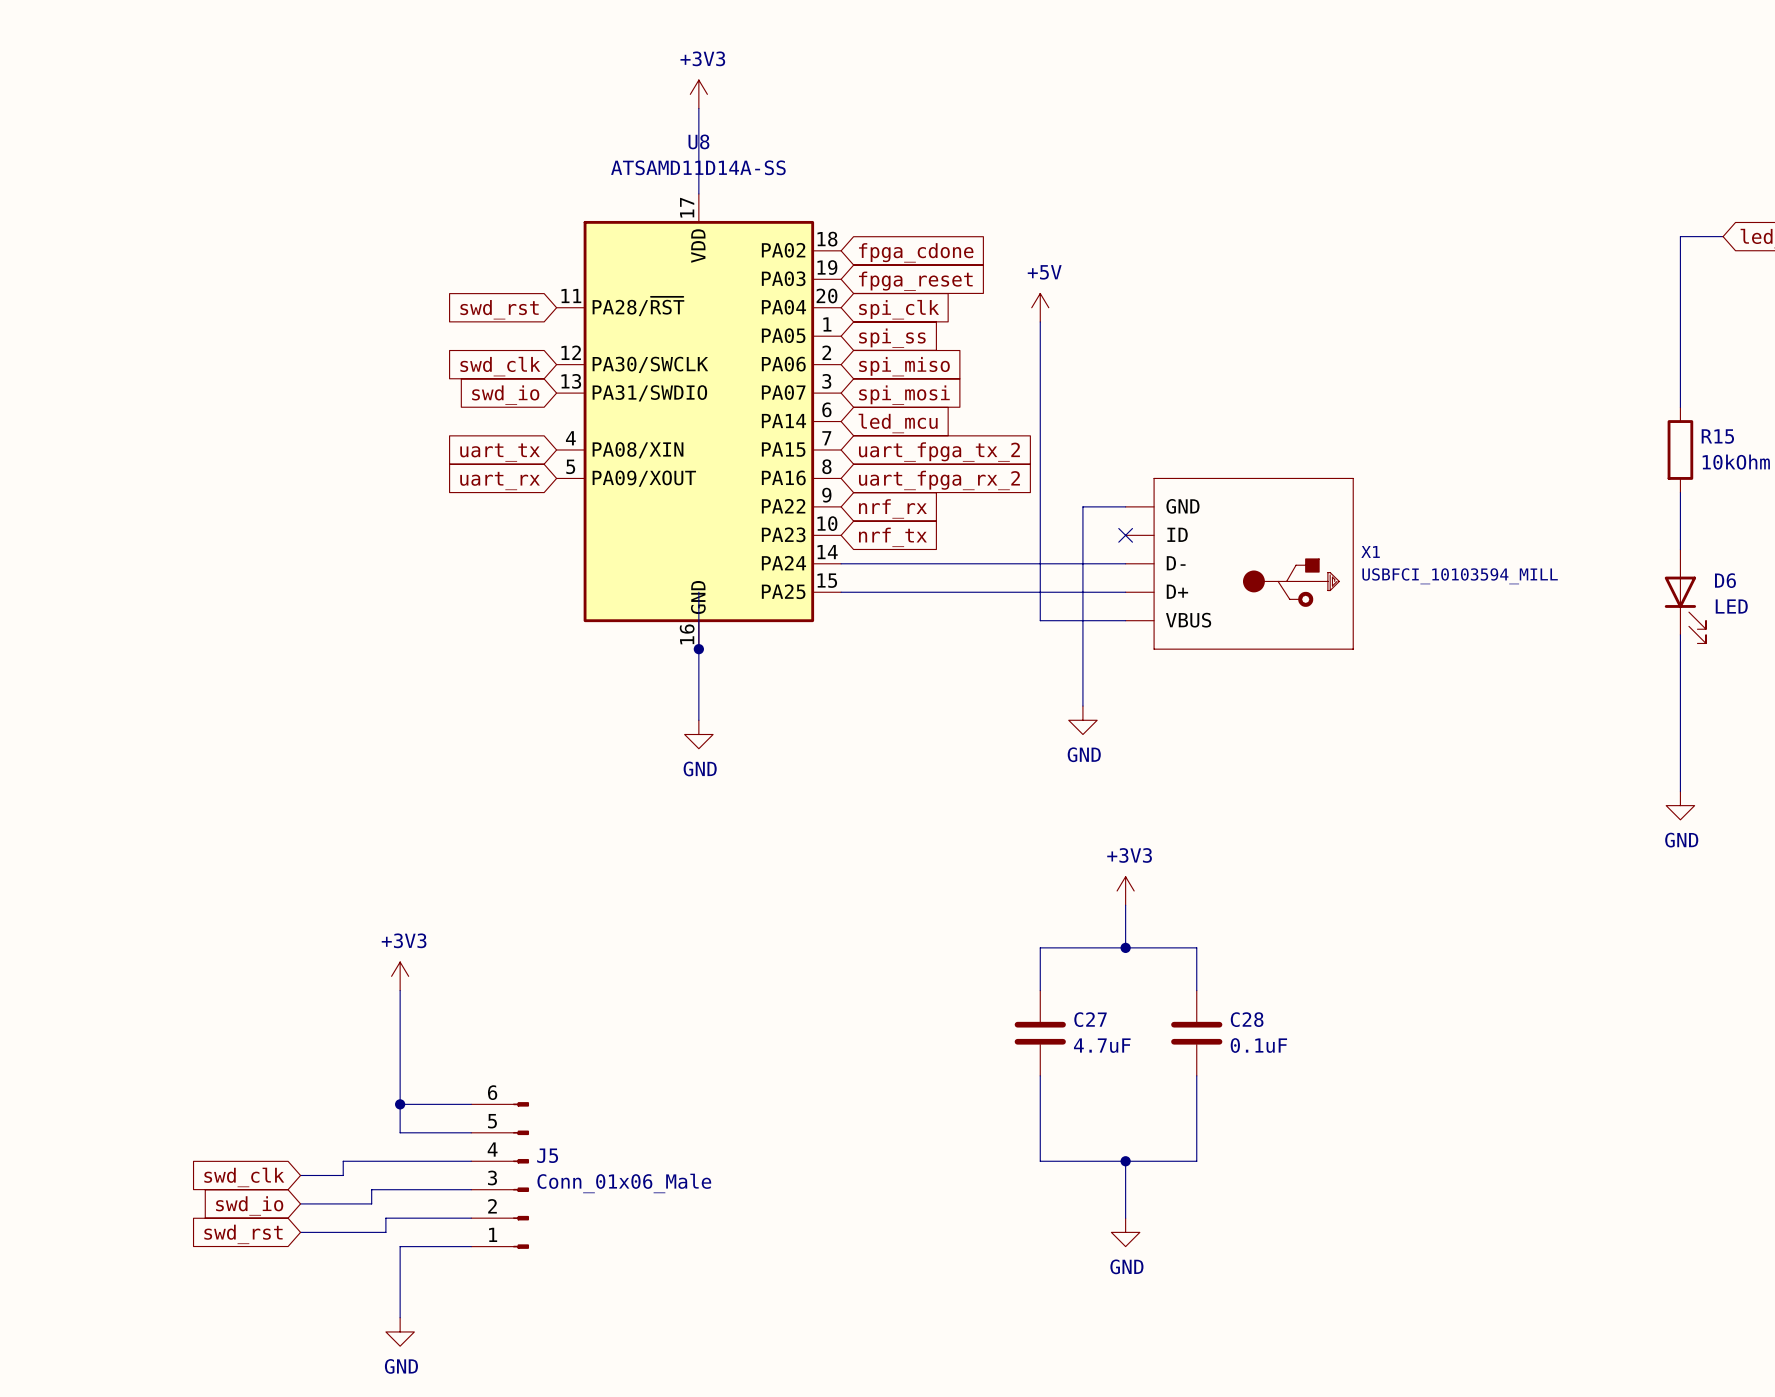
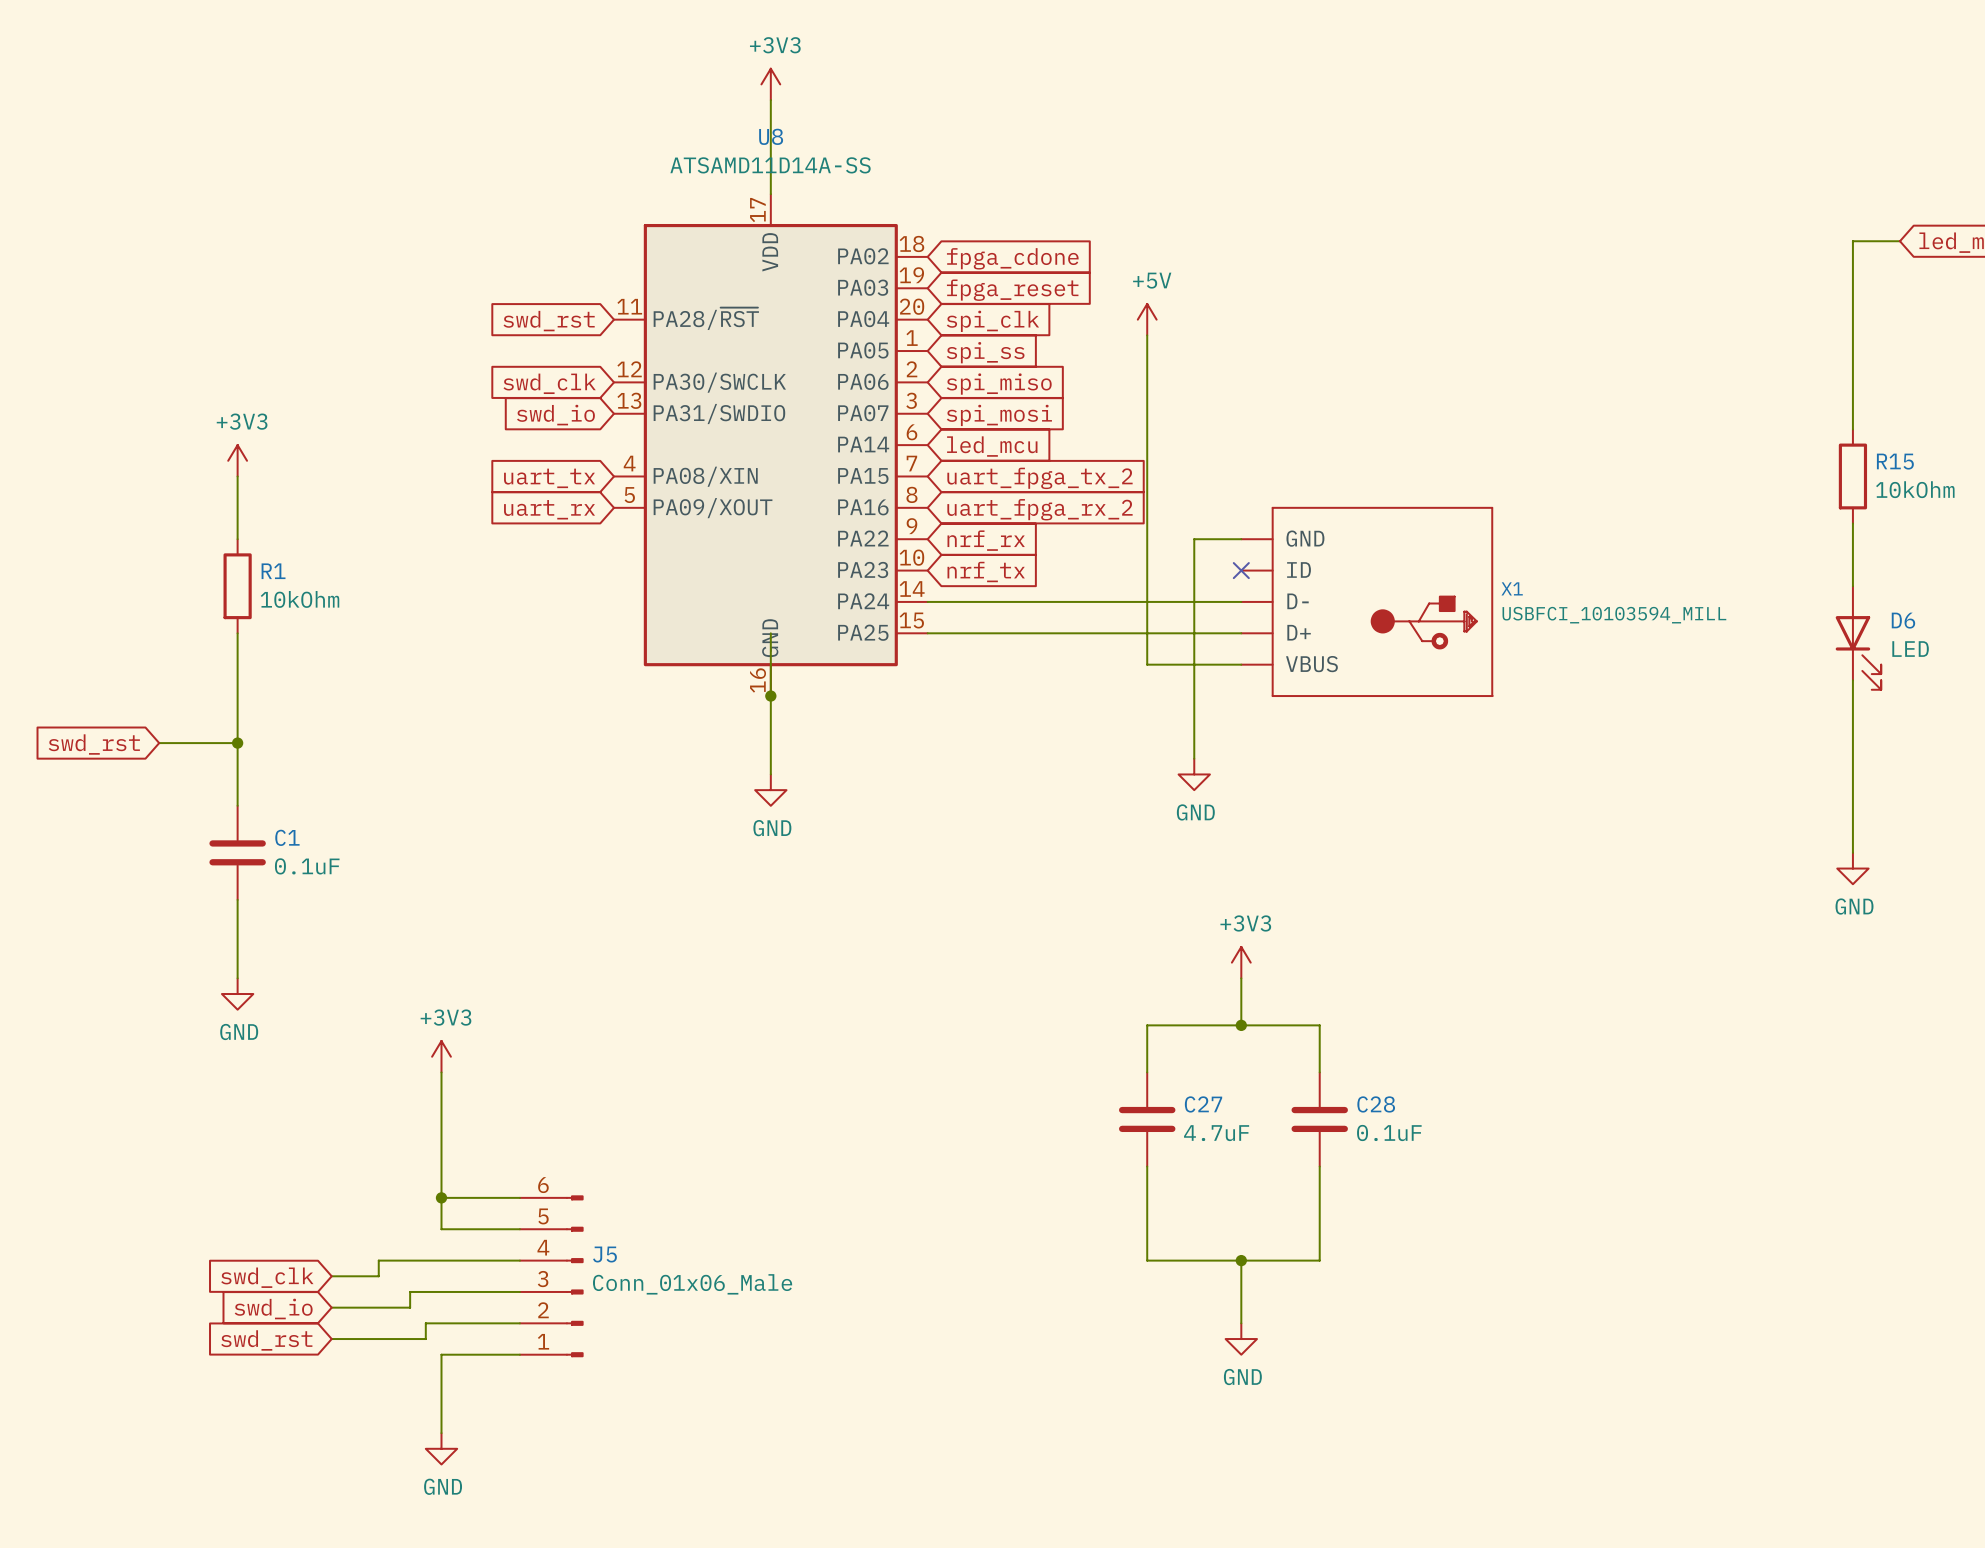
power symbol: none -> +3V3 (237, 460)
wire: none -> (237, 476) (237, 539)
R1: none -> 10kOhm (237, 586)
wire: none -> (237, 633) (237, 805)
wire: none -> (159, 743) (237, 743)
junction: none -> (237, 743)
global label: none -> swd_rst (94, 744)
C1: none -> 0.1uF (237, 852)
wire: none -> (237, 899) (237, 978)
power symbol: none -> GND (237, 994)

